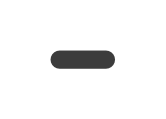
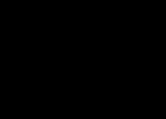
line: (59, 59) (105, 59) -> none

